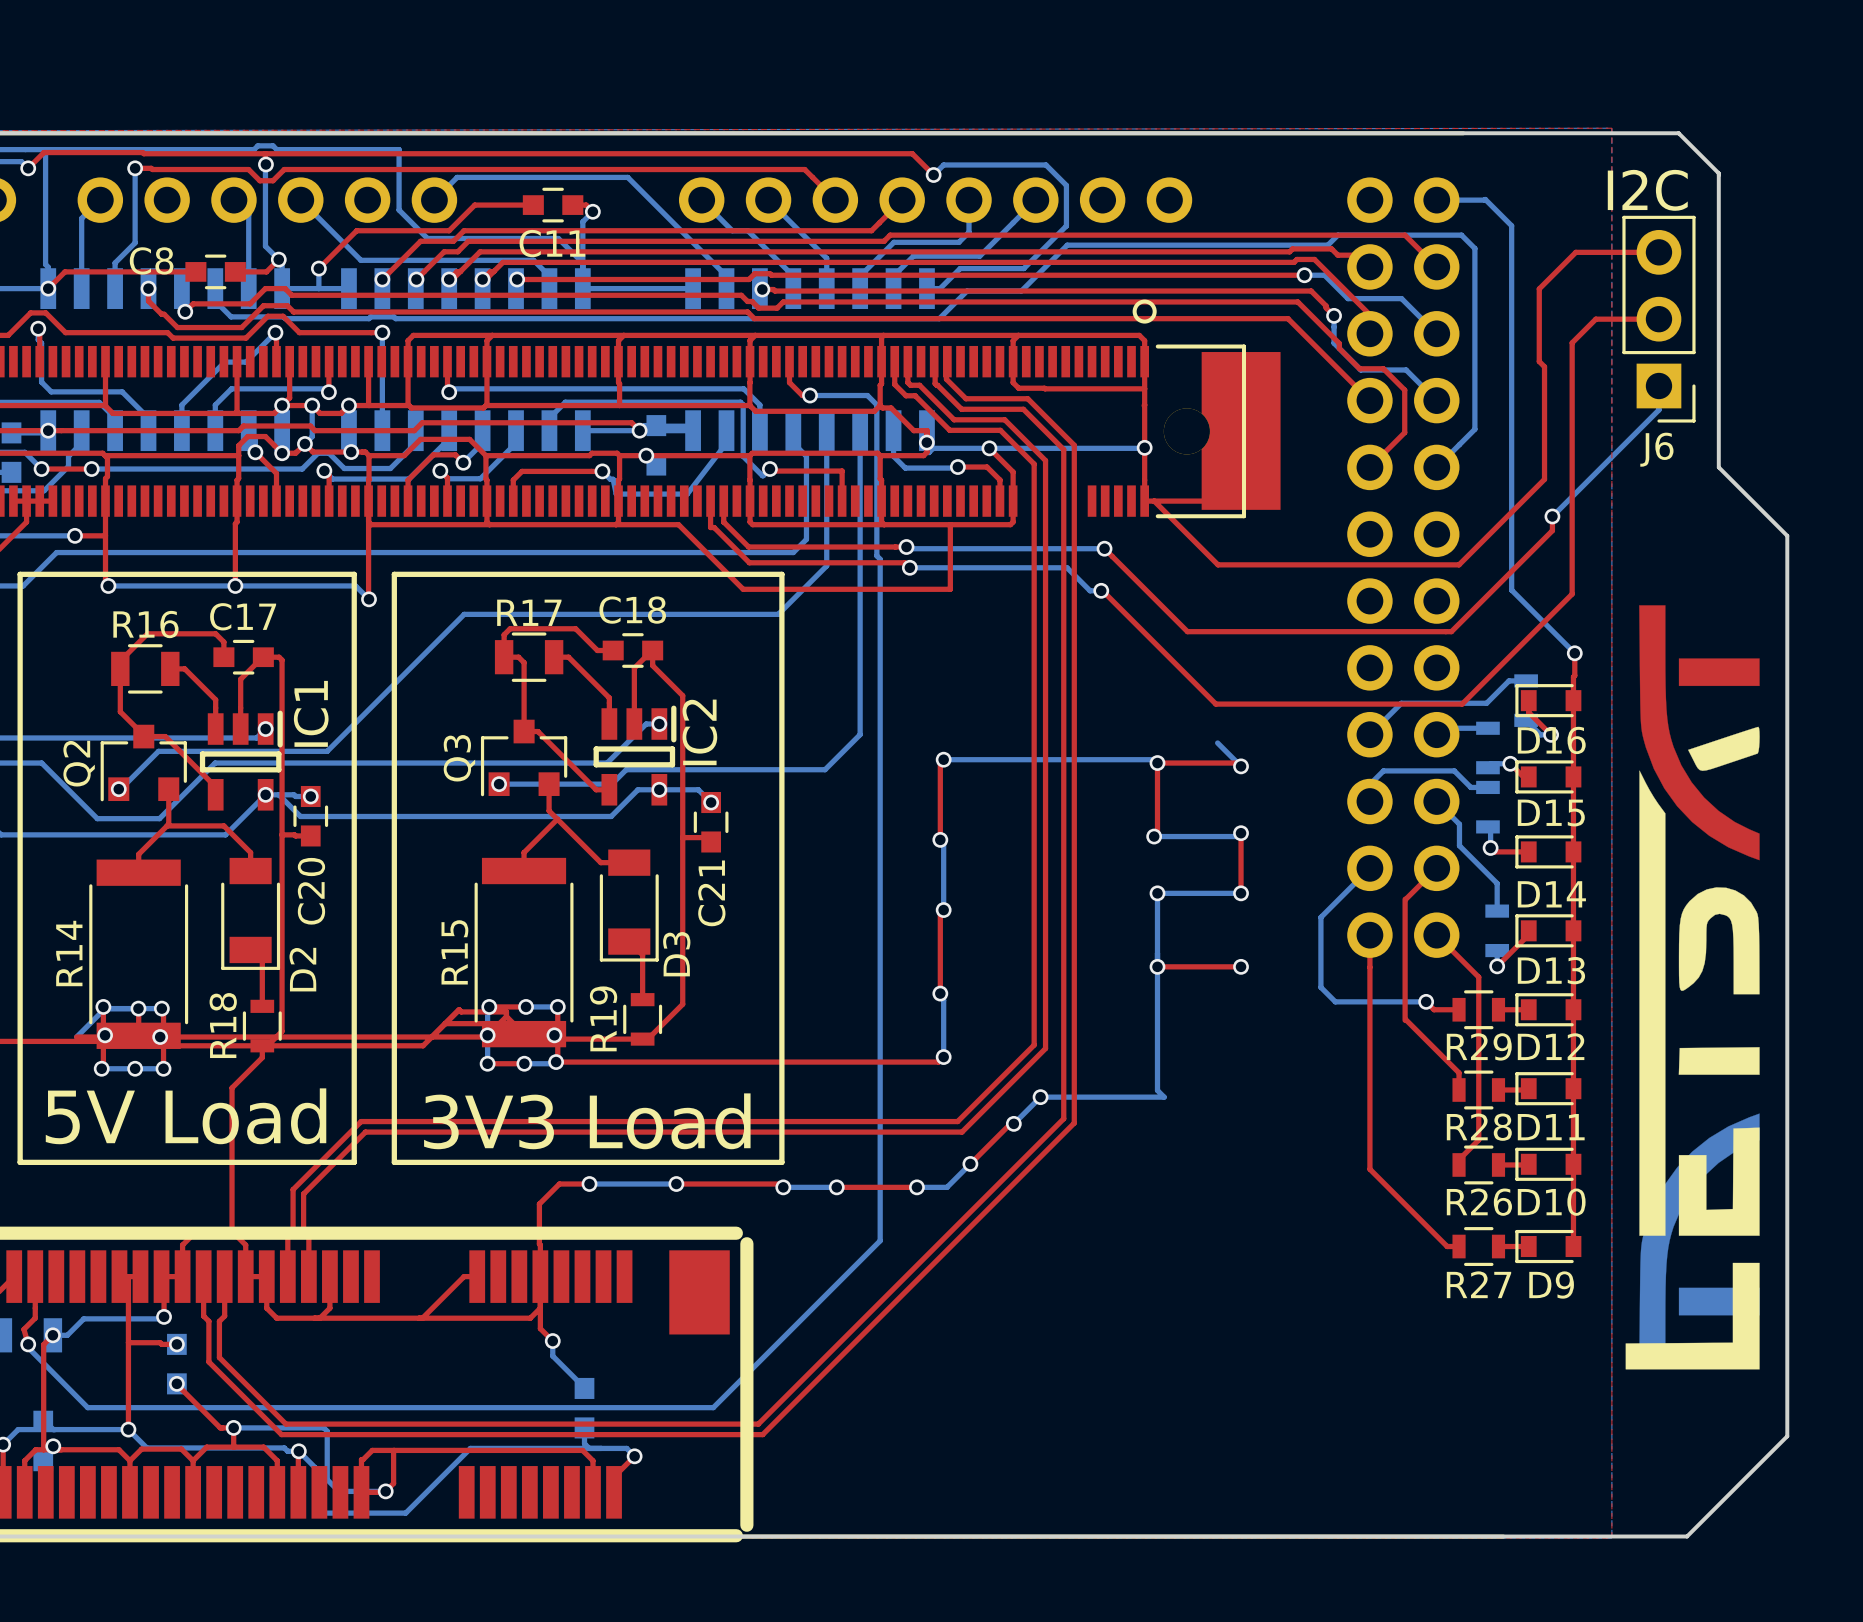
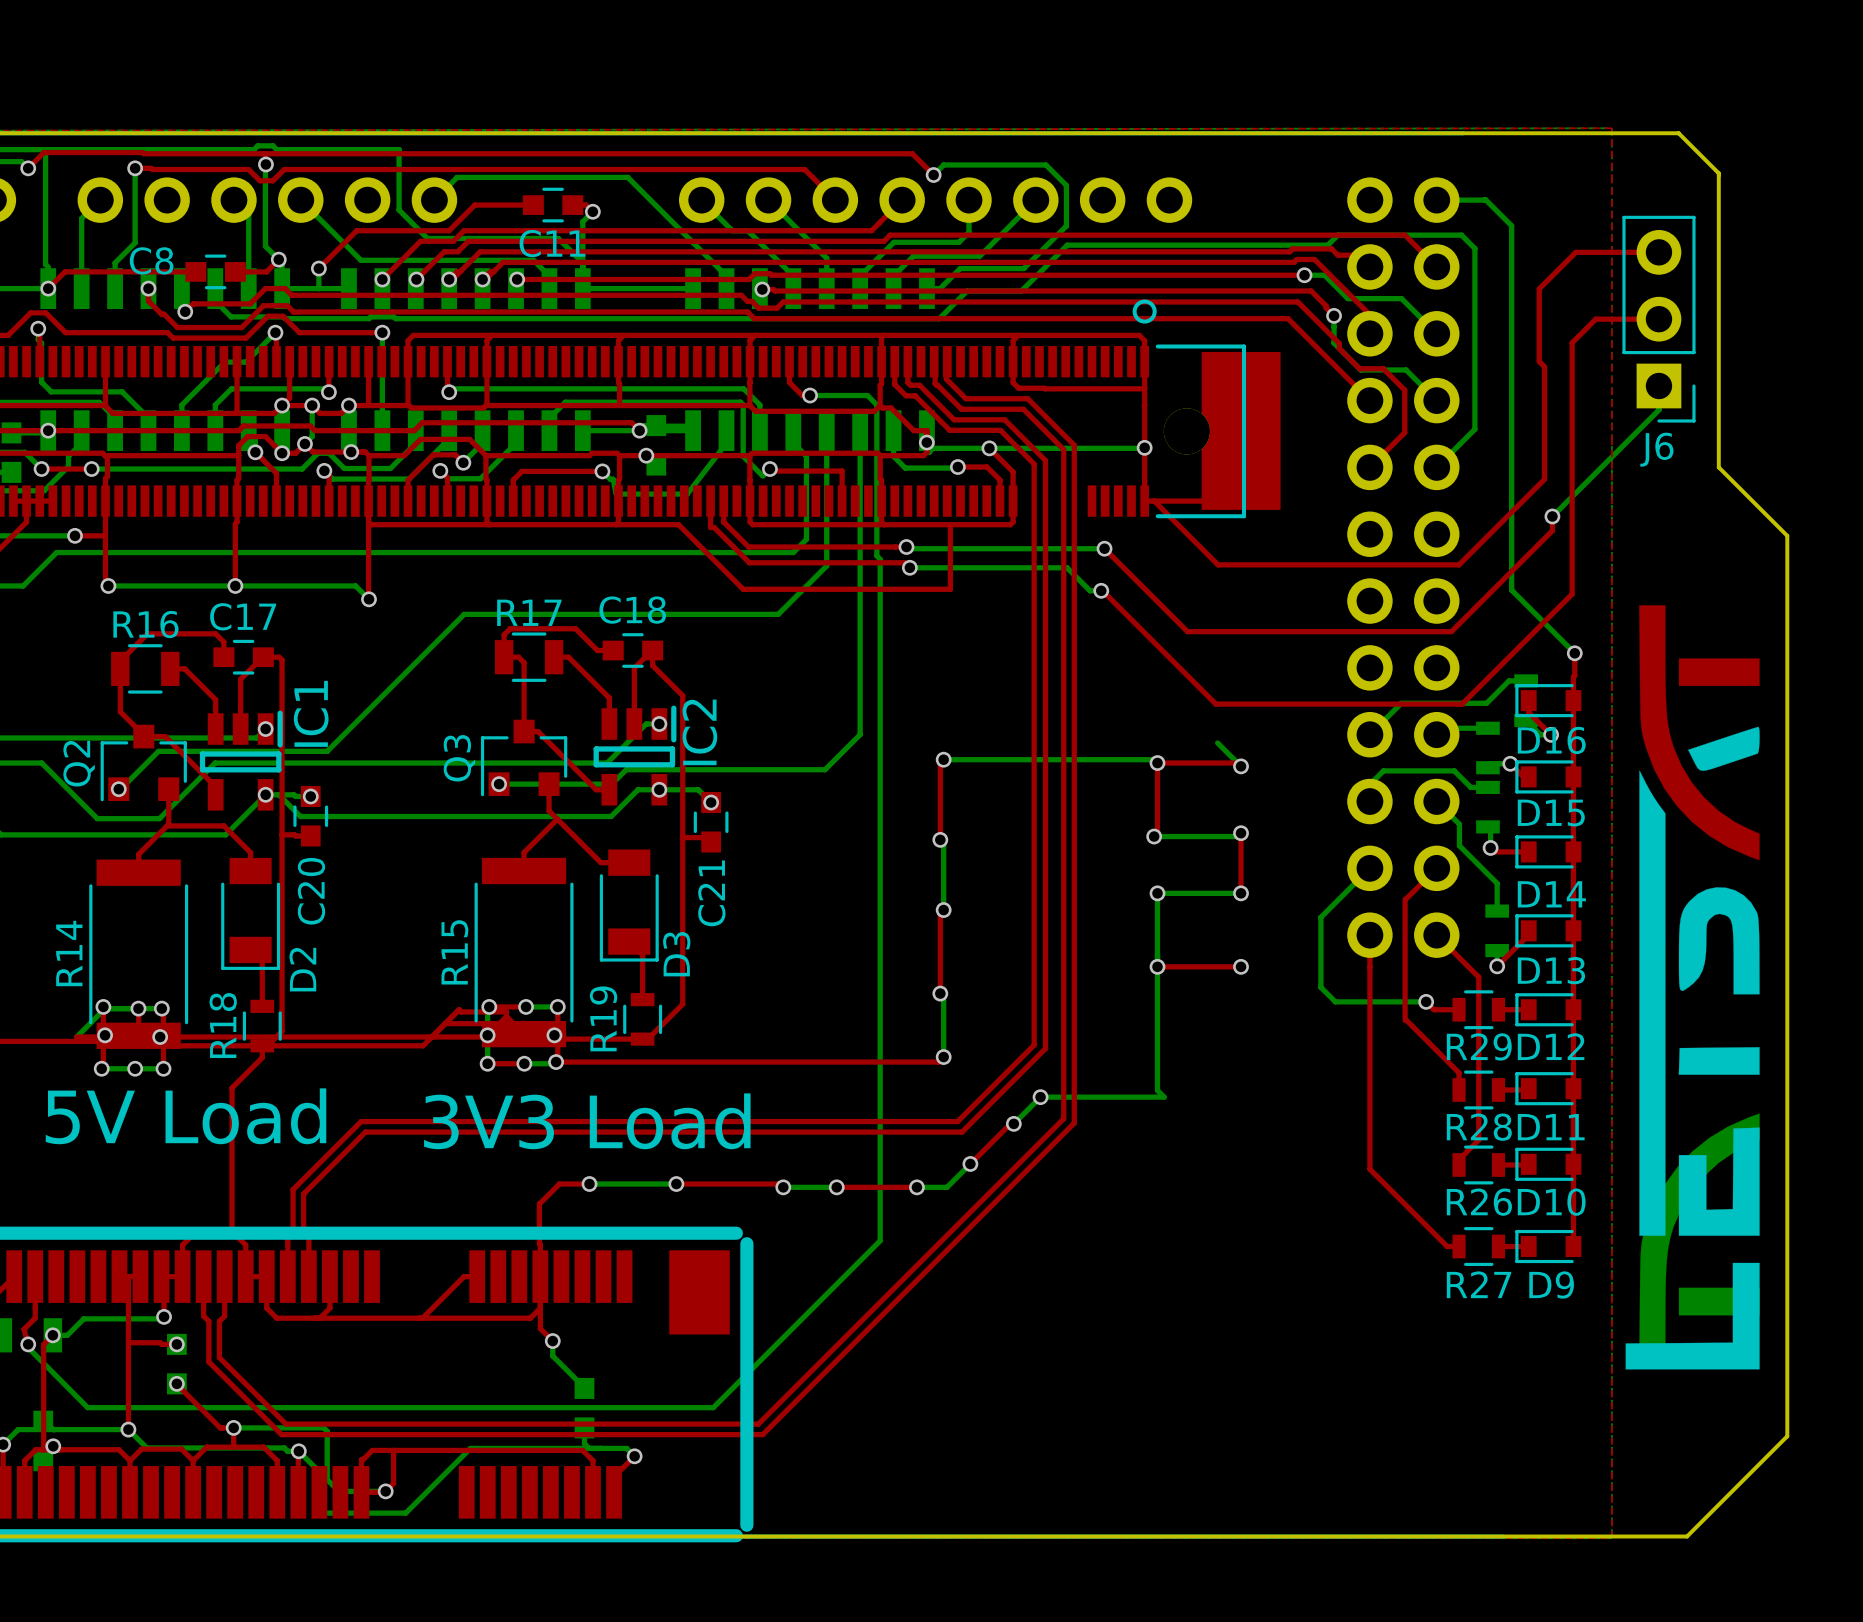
text: I2C (1647, 190) -> none
line: (20, 574) (354, 574) (354, 1162) (20, 1162) (20, 574) -> none
line: (394, 574) (781, 574) (781, 1162) (394, 1162) (394, 574) -> none

